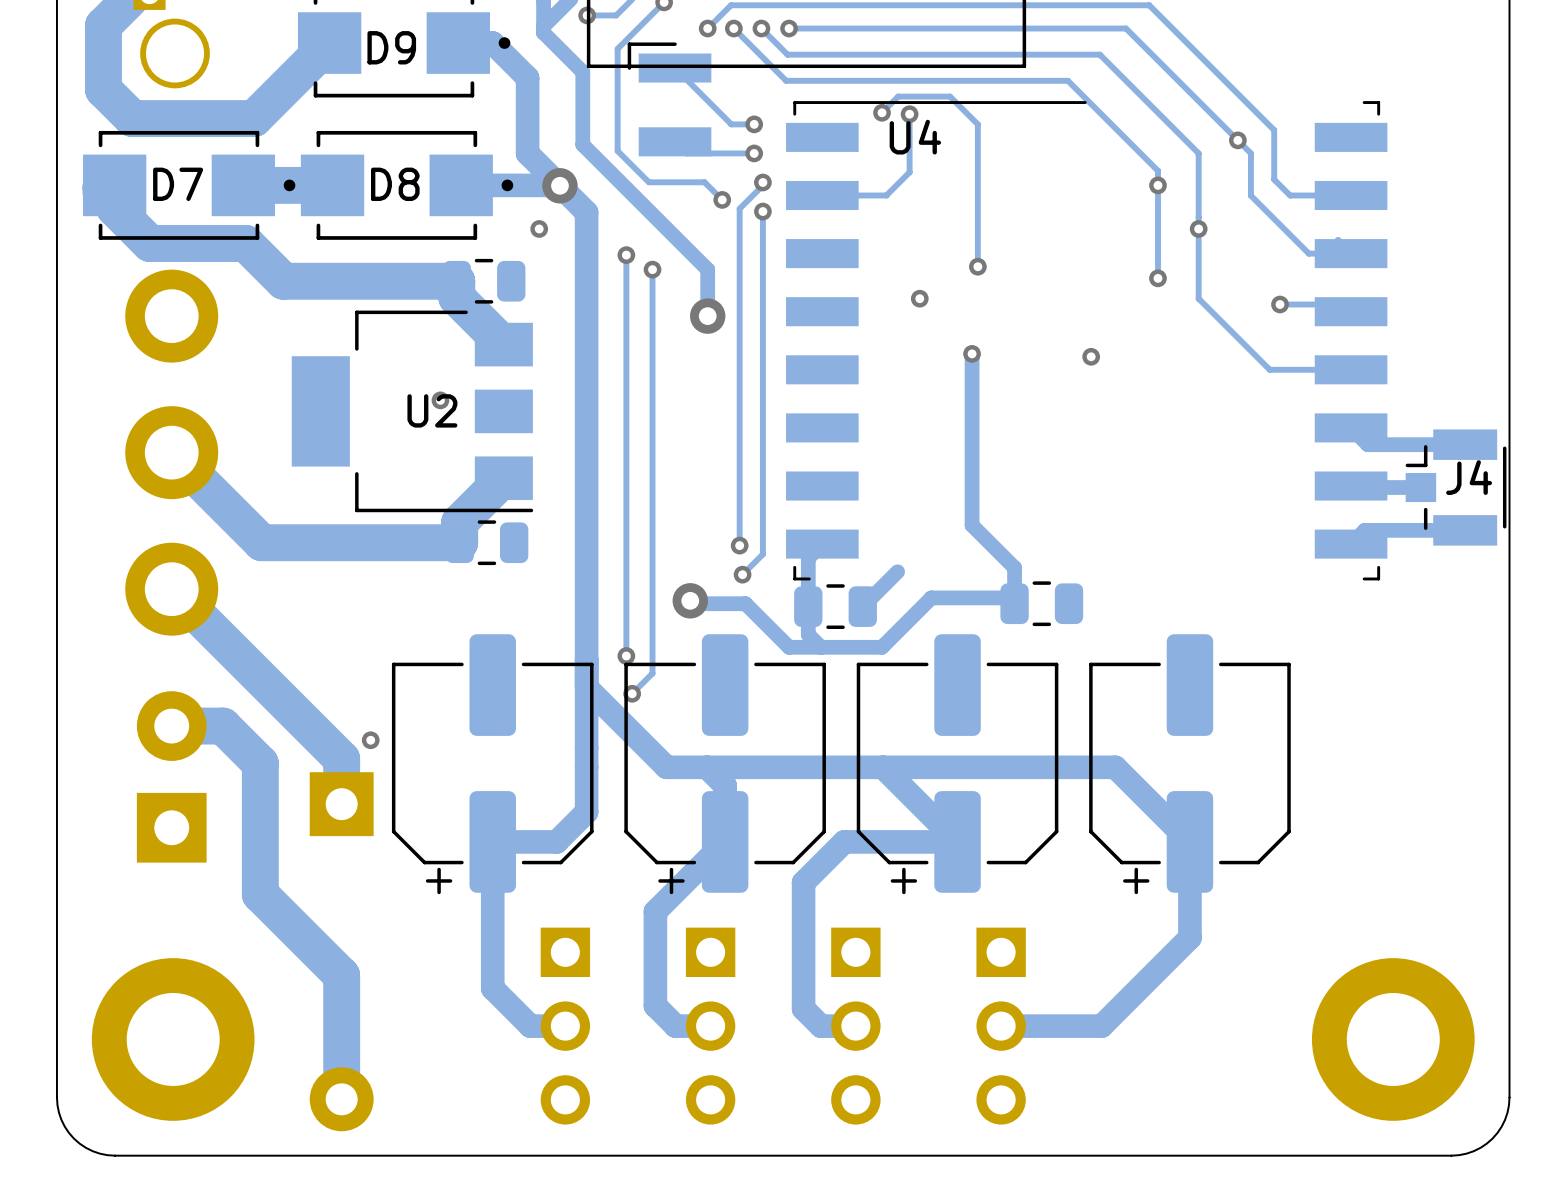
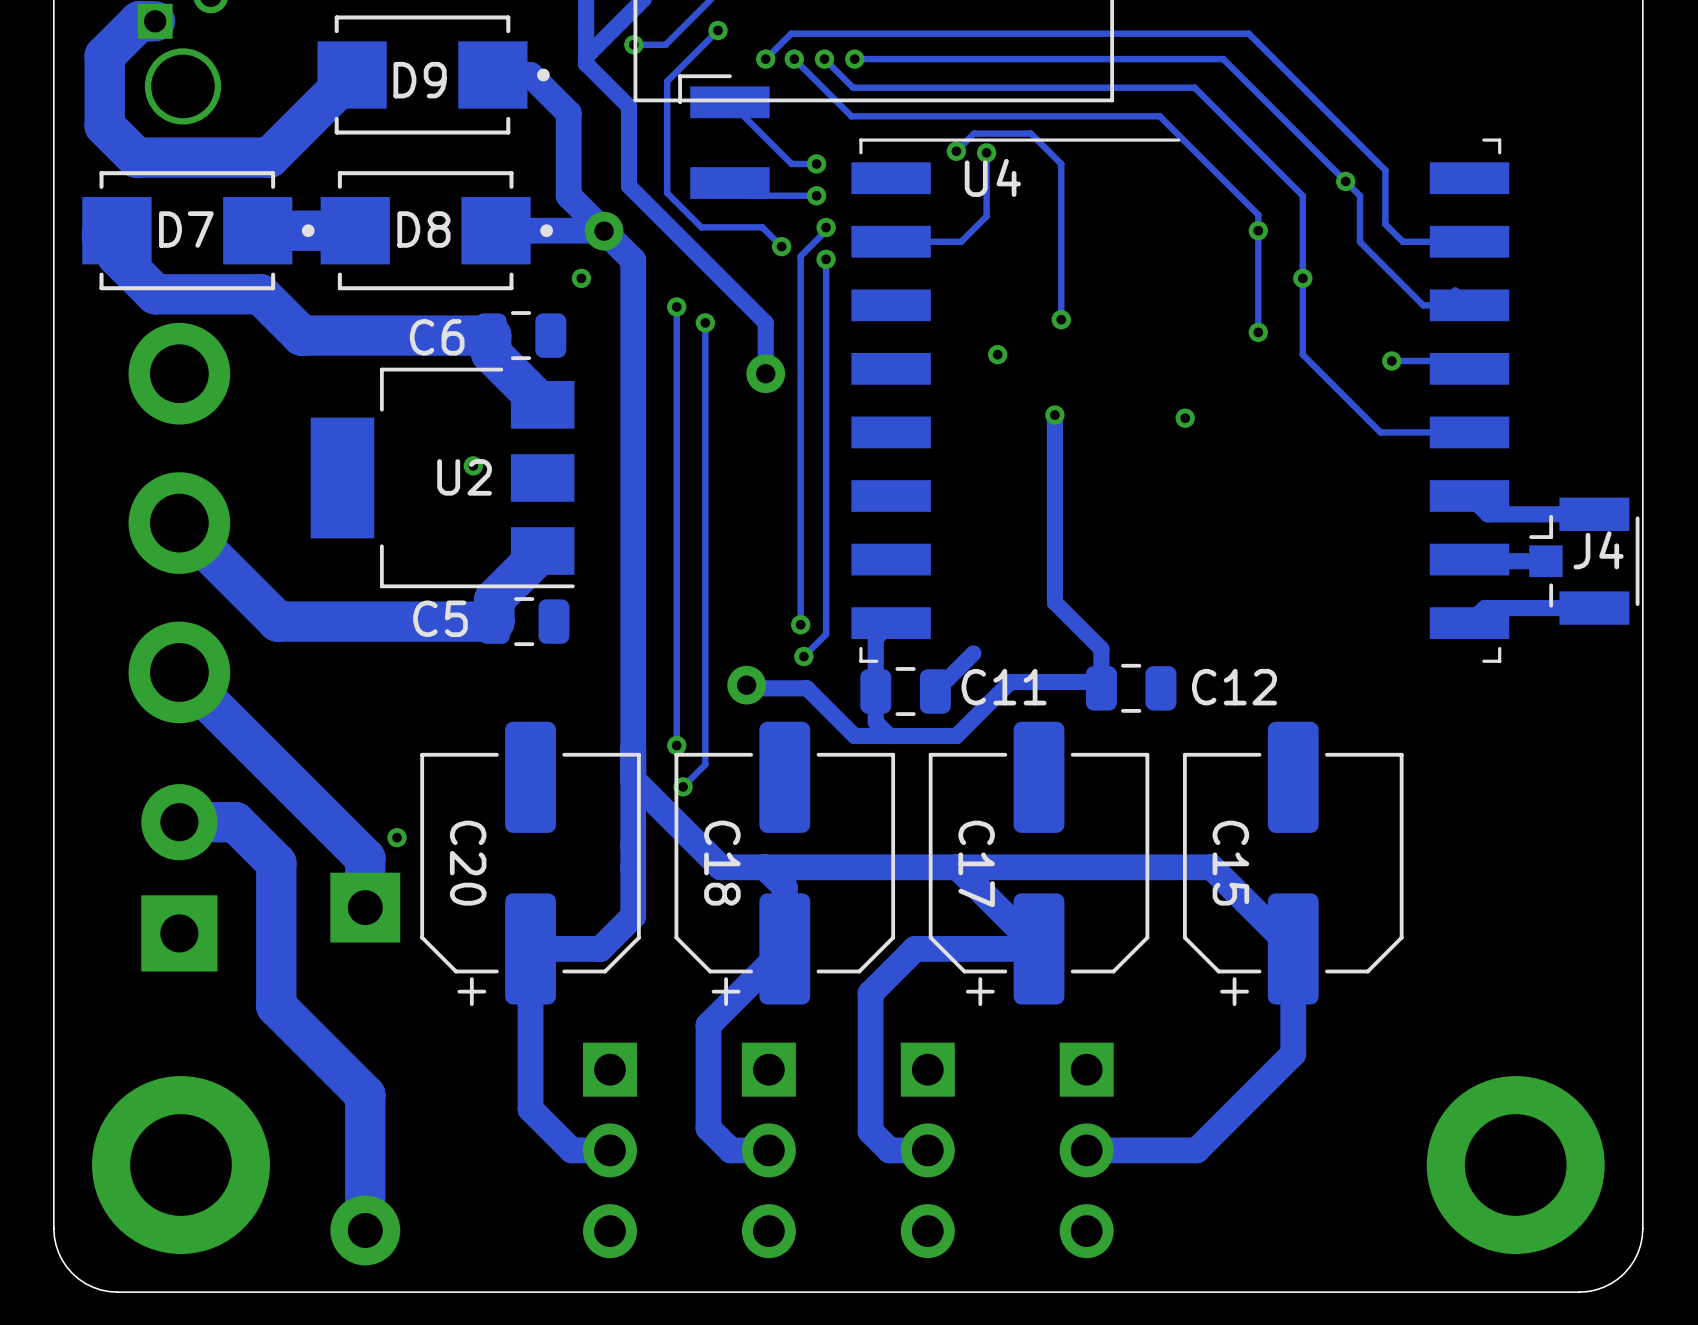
C6 name: none -> C6 (437, 337)
C5 name: none -> C5 (440, 618)
C11 name: none -> C11 (1004, 687)
C12 name: none -> C12 (1234, 687)
C20 name: none -> C20 (468, 863)
C18 name: none -> C18 (722, 863)
C15 name: none -> C15 (1230, 863)
C17 name: none -> C17 (976, 863)

